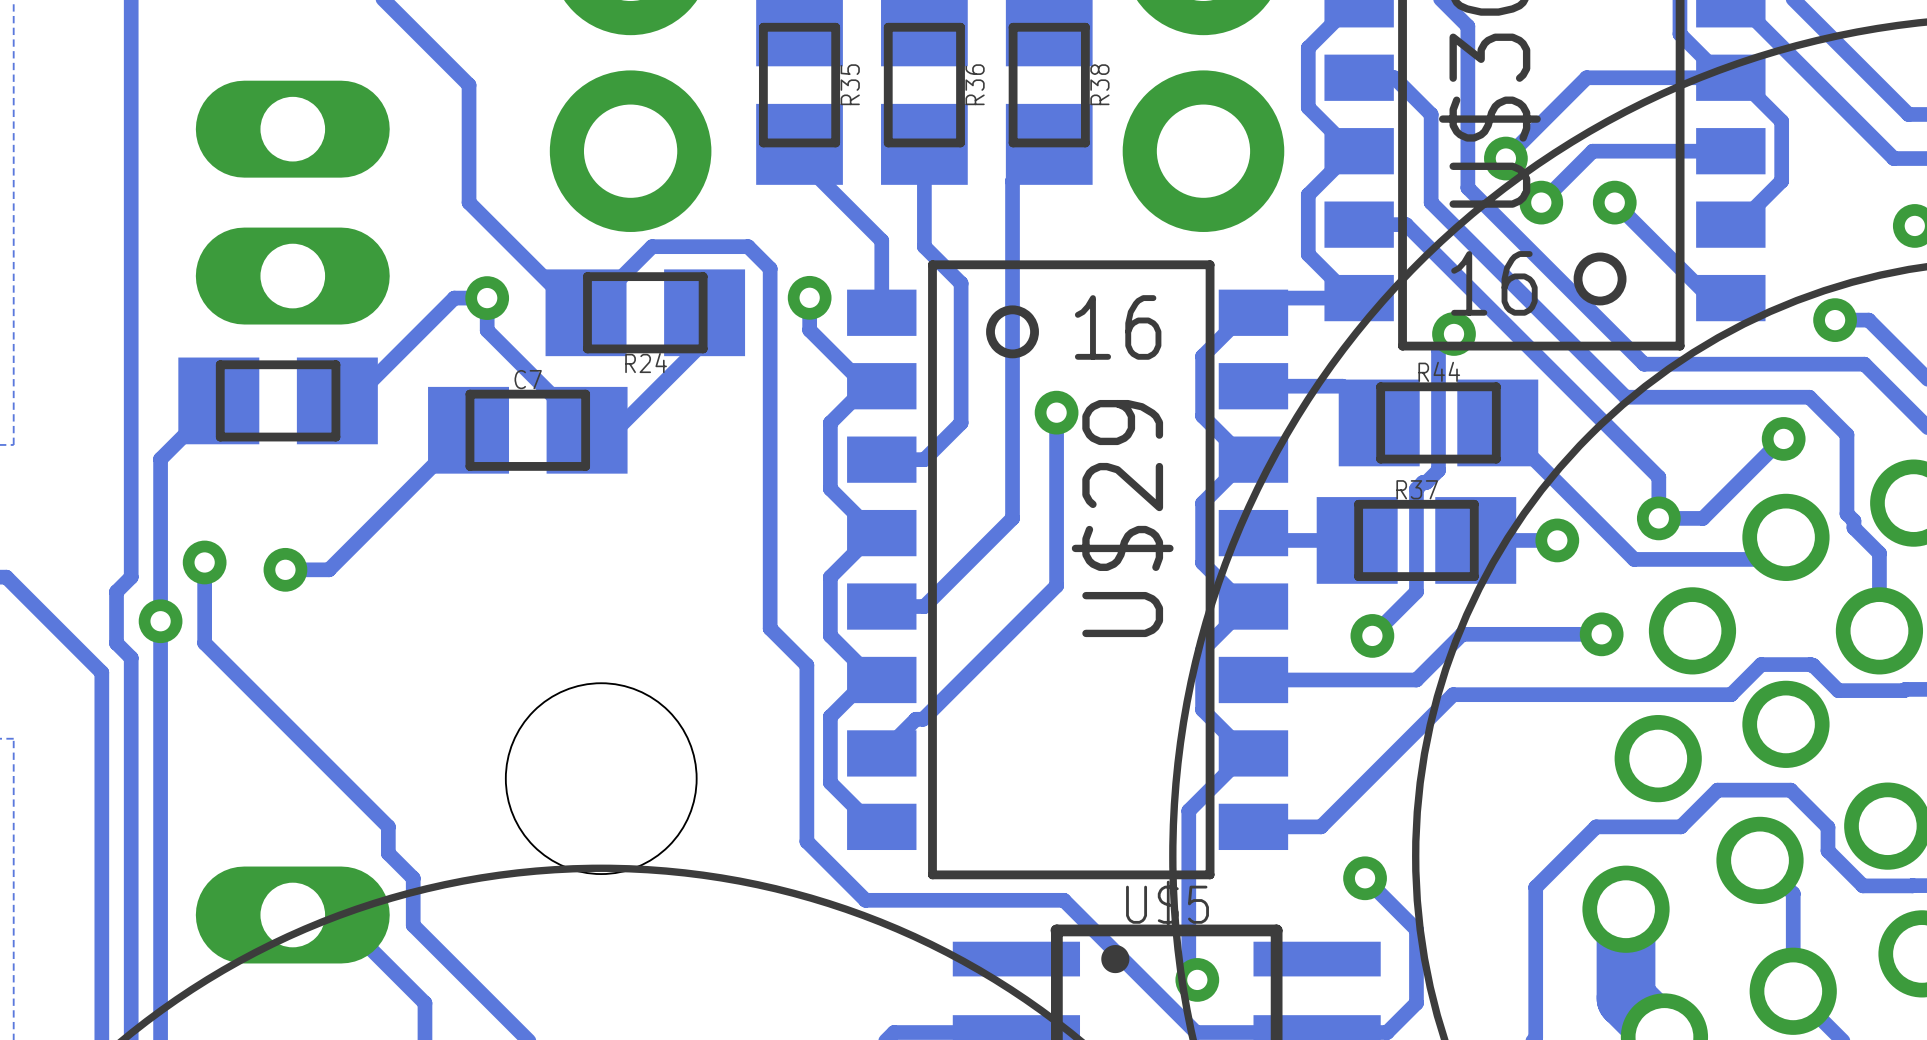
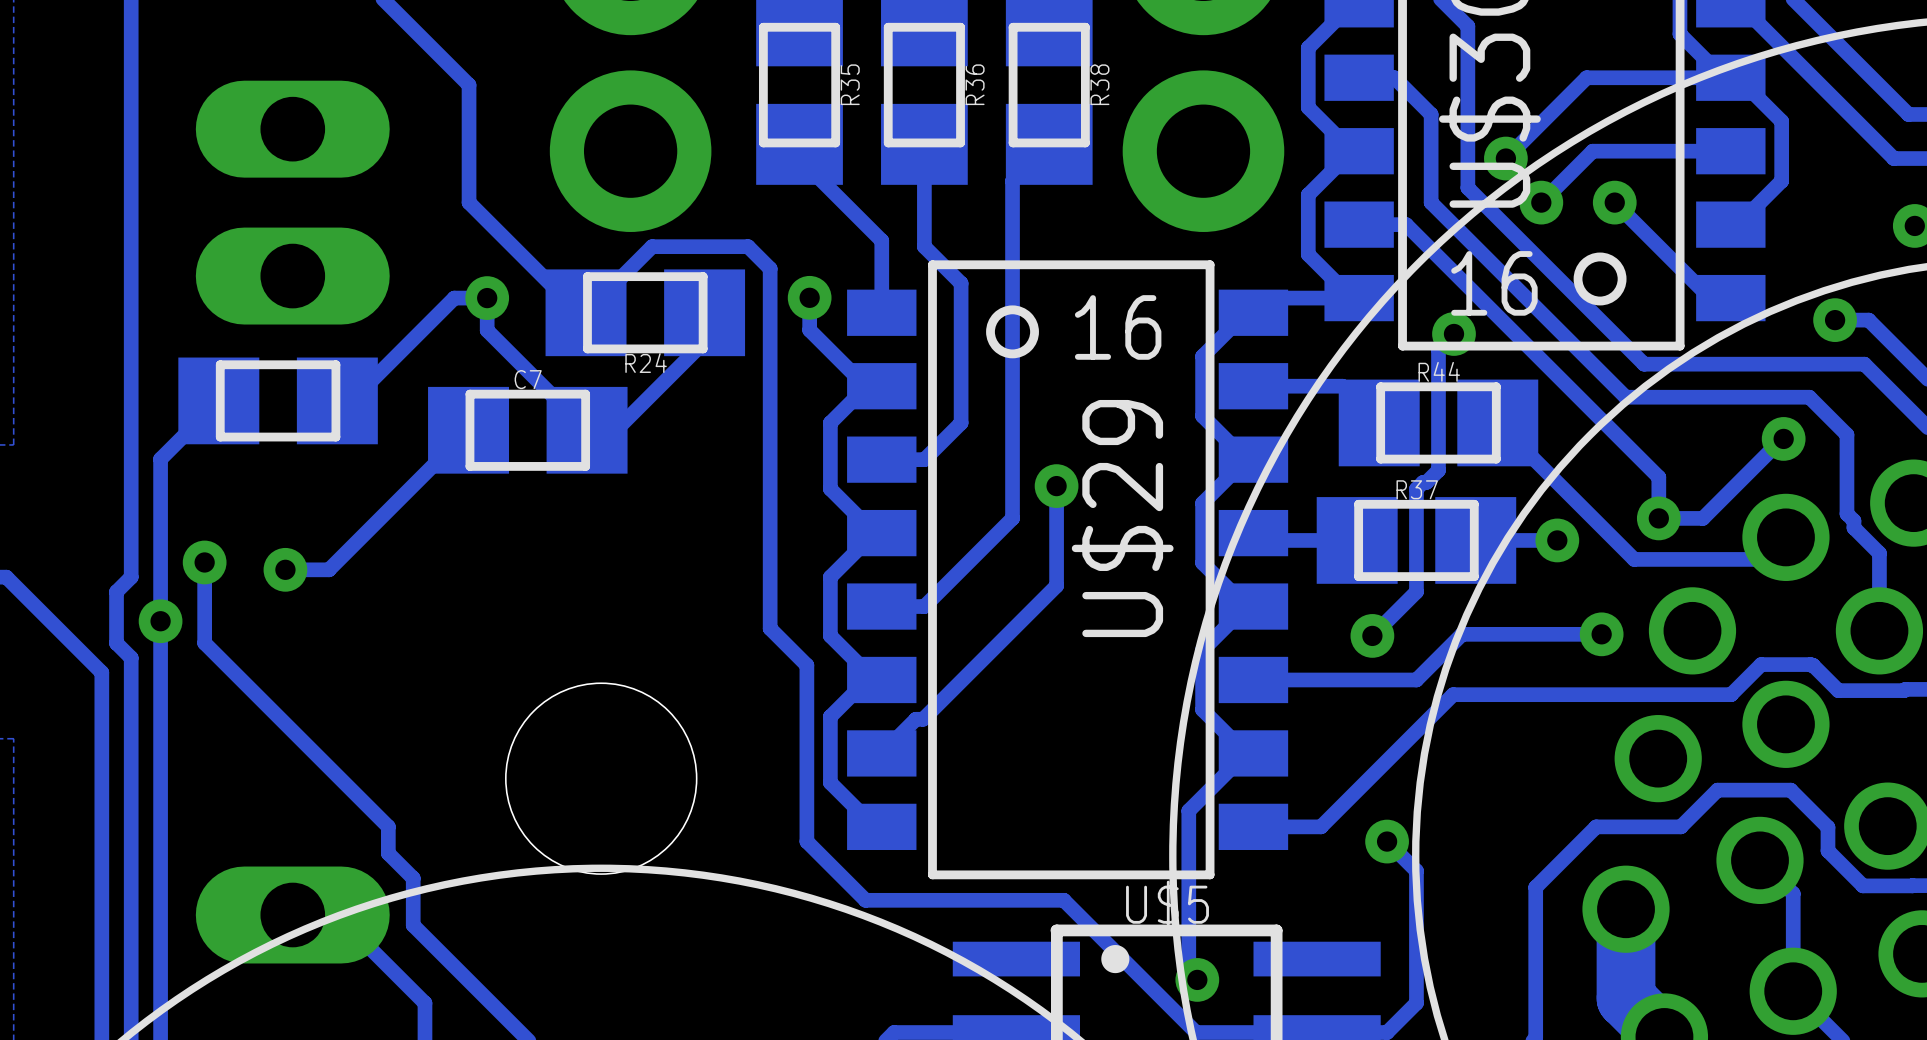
track: (1056, 412) (1056, 486) -> none
via position: (1056, 412) -> (1056, 486)
track: (1365, 878) (1416, 929) -> (1387, 841) (1416, 870) (1416, 929)
via position: (1365, 878) -> (1387, 841)

